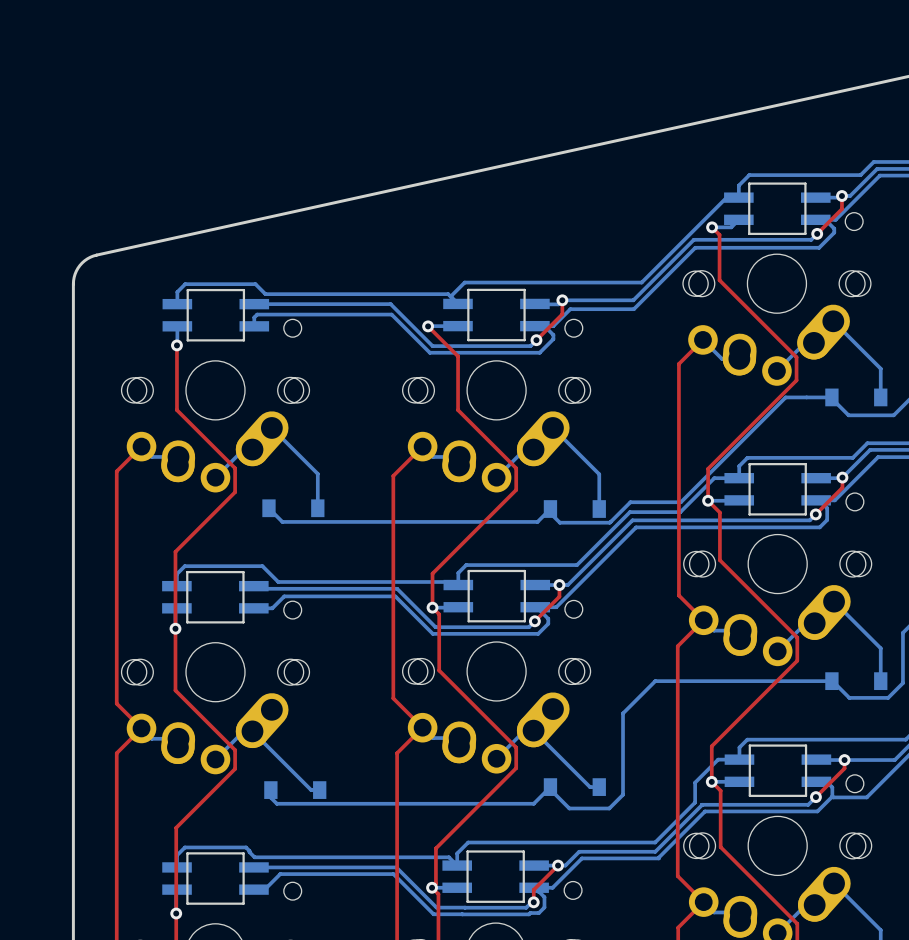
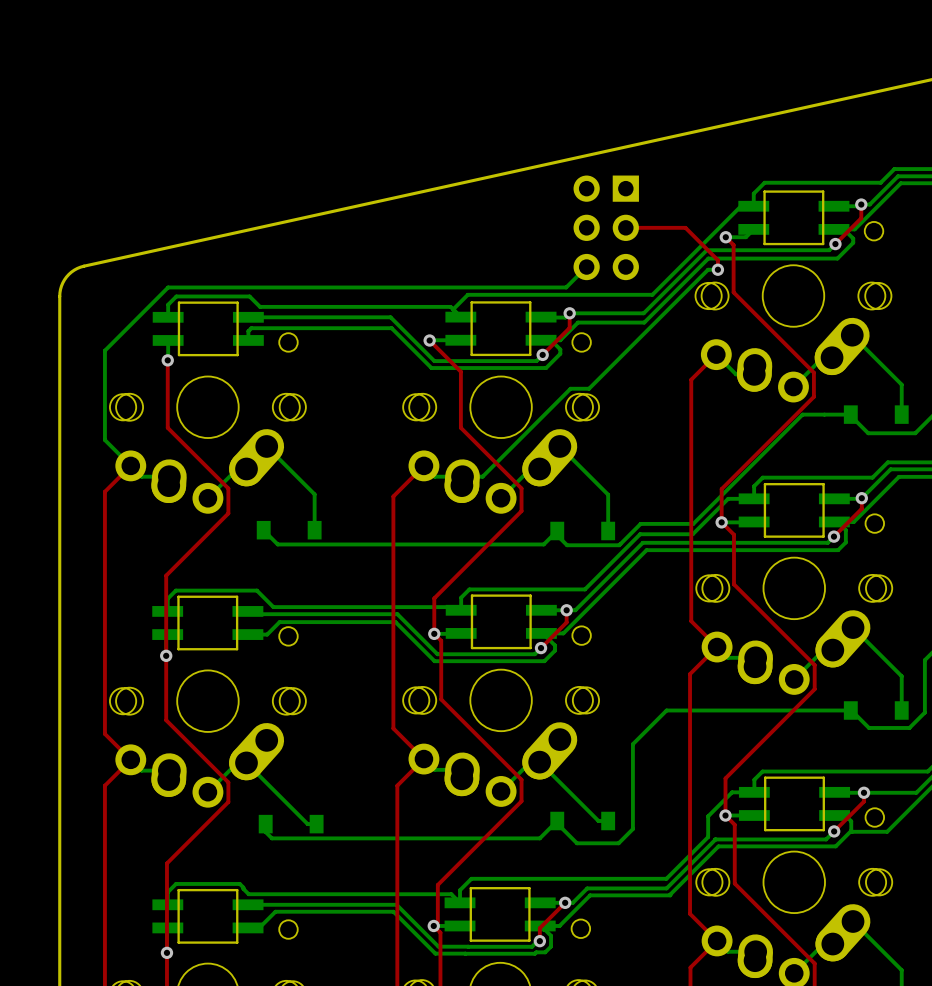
part: none -> (606, 227)
top track: none -> (625, 227) (685, 227) (717, 260) (717, 269)
bottom track: none -> (586, 267) (566, 287) (168, 287) (104, 350) (104, 440) (130, 465)
bottom track: none -> (717, 269) (708, 269) (589, 388) (570, 388) (482, 476) (462, 476)
via: none -> (717, 269)

